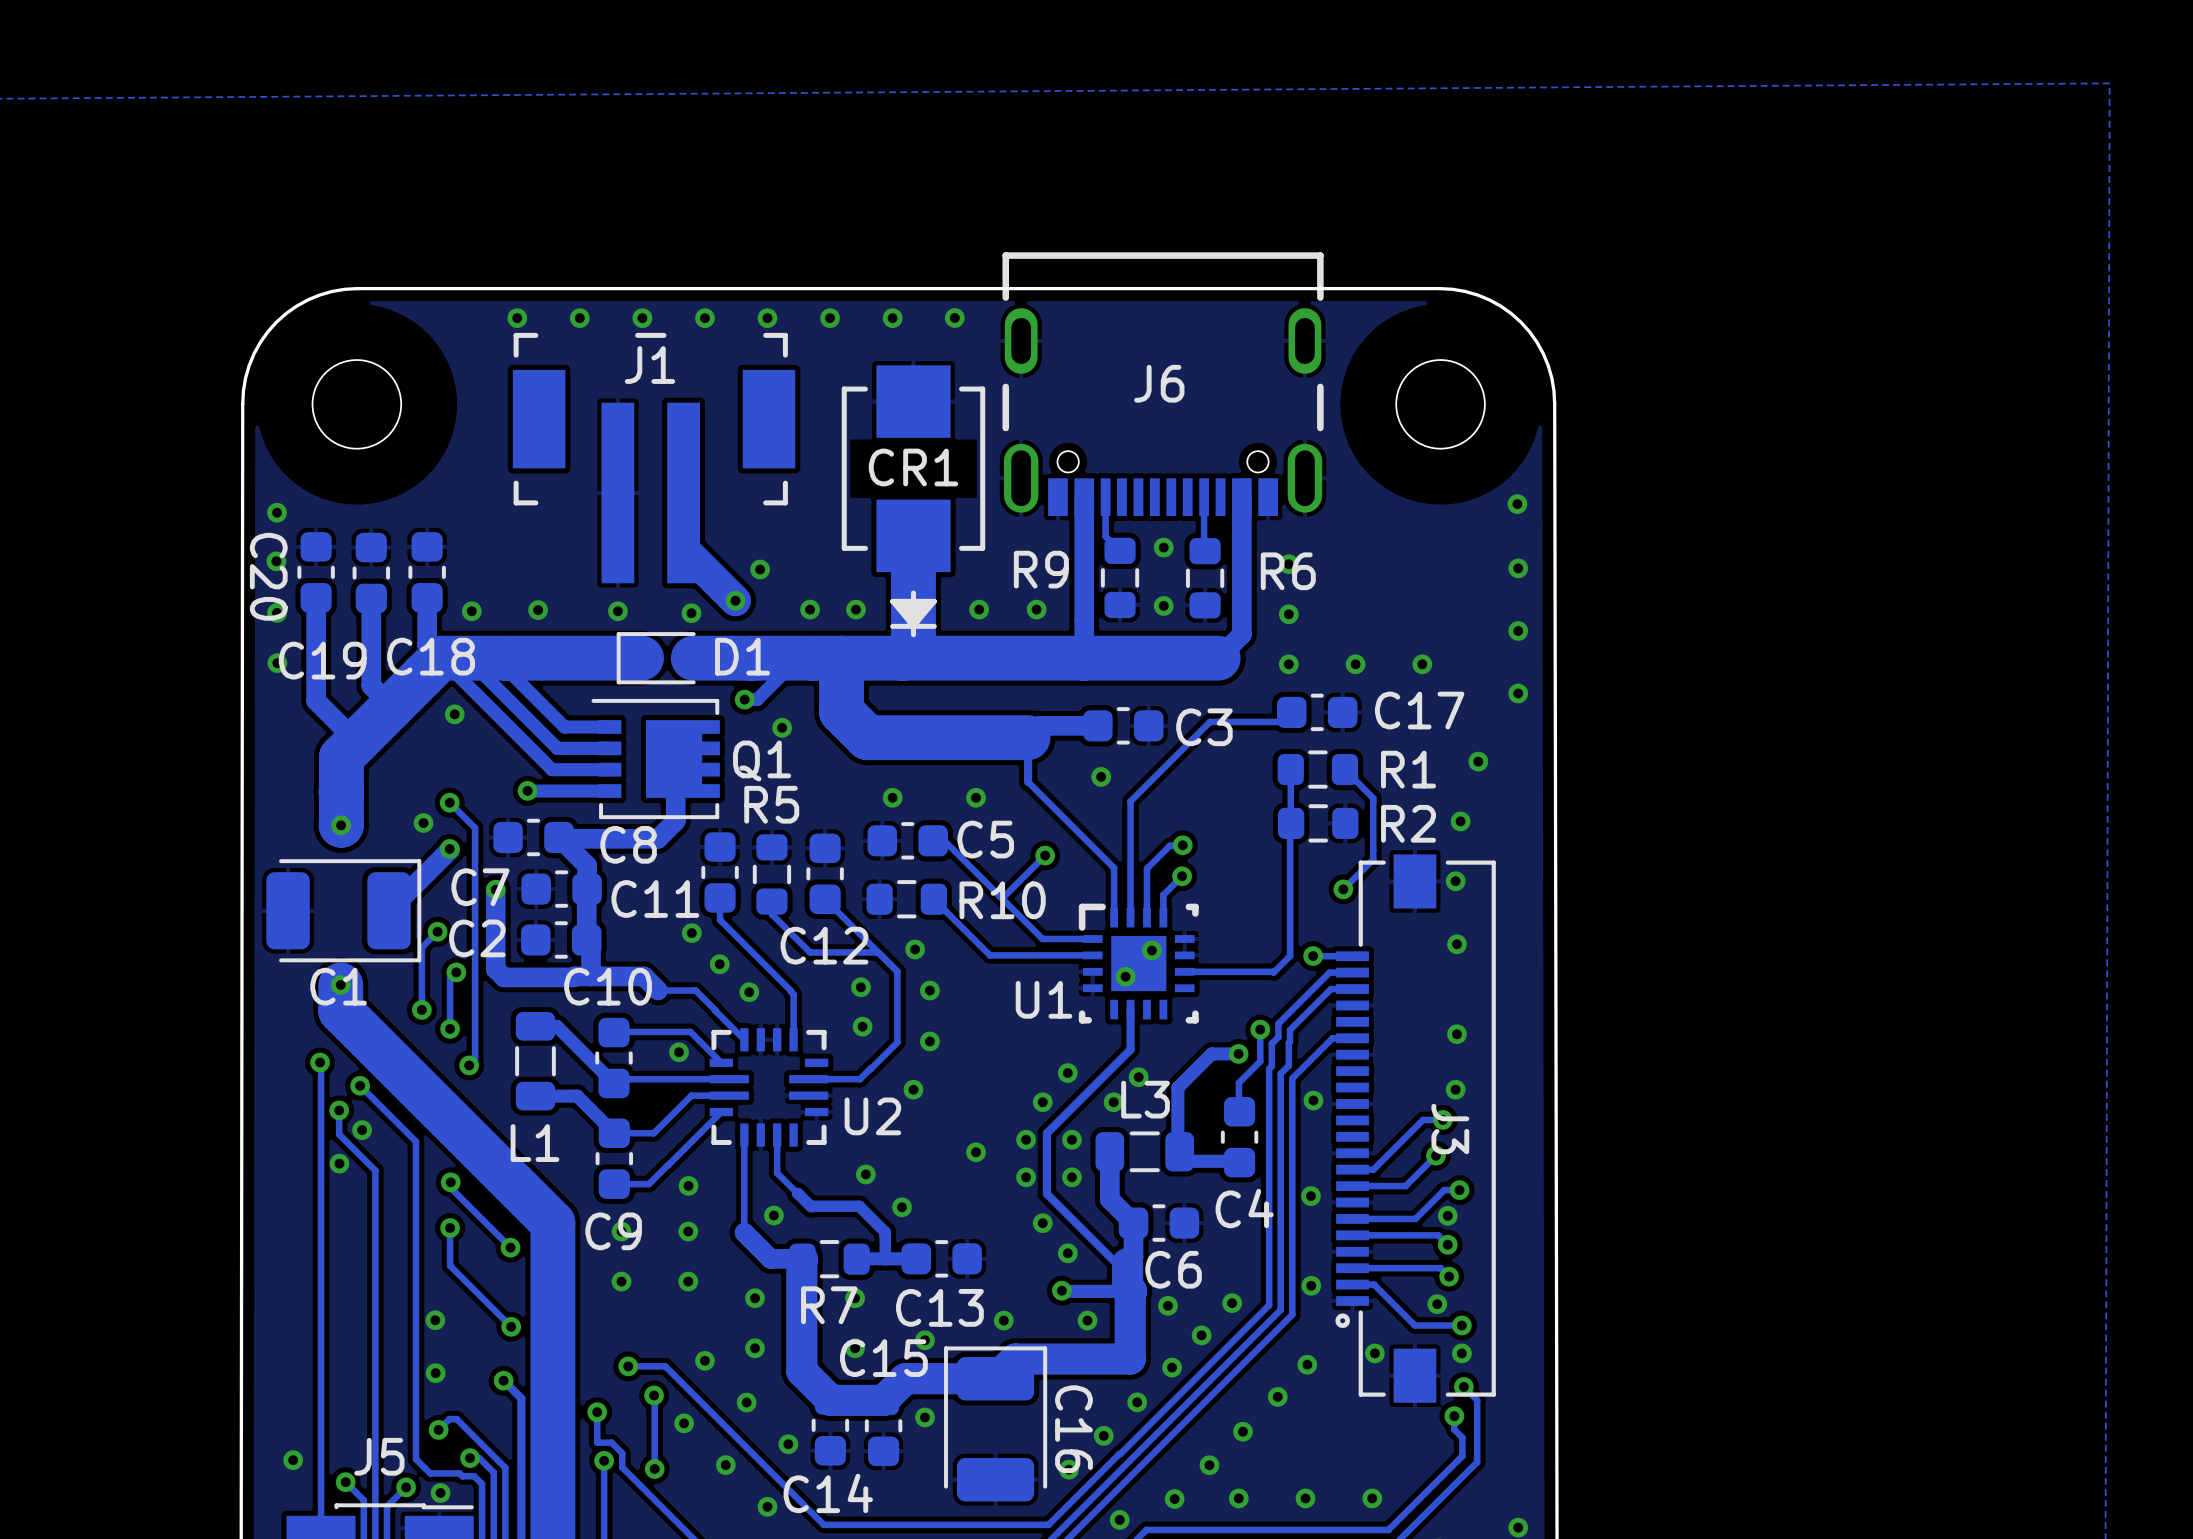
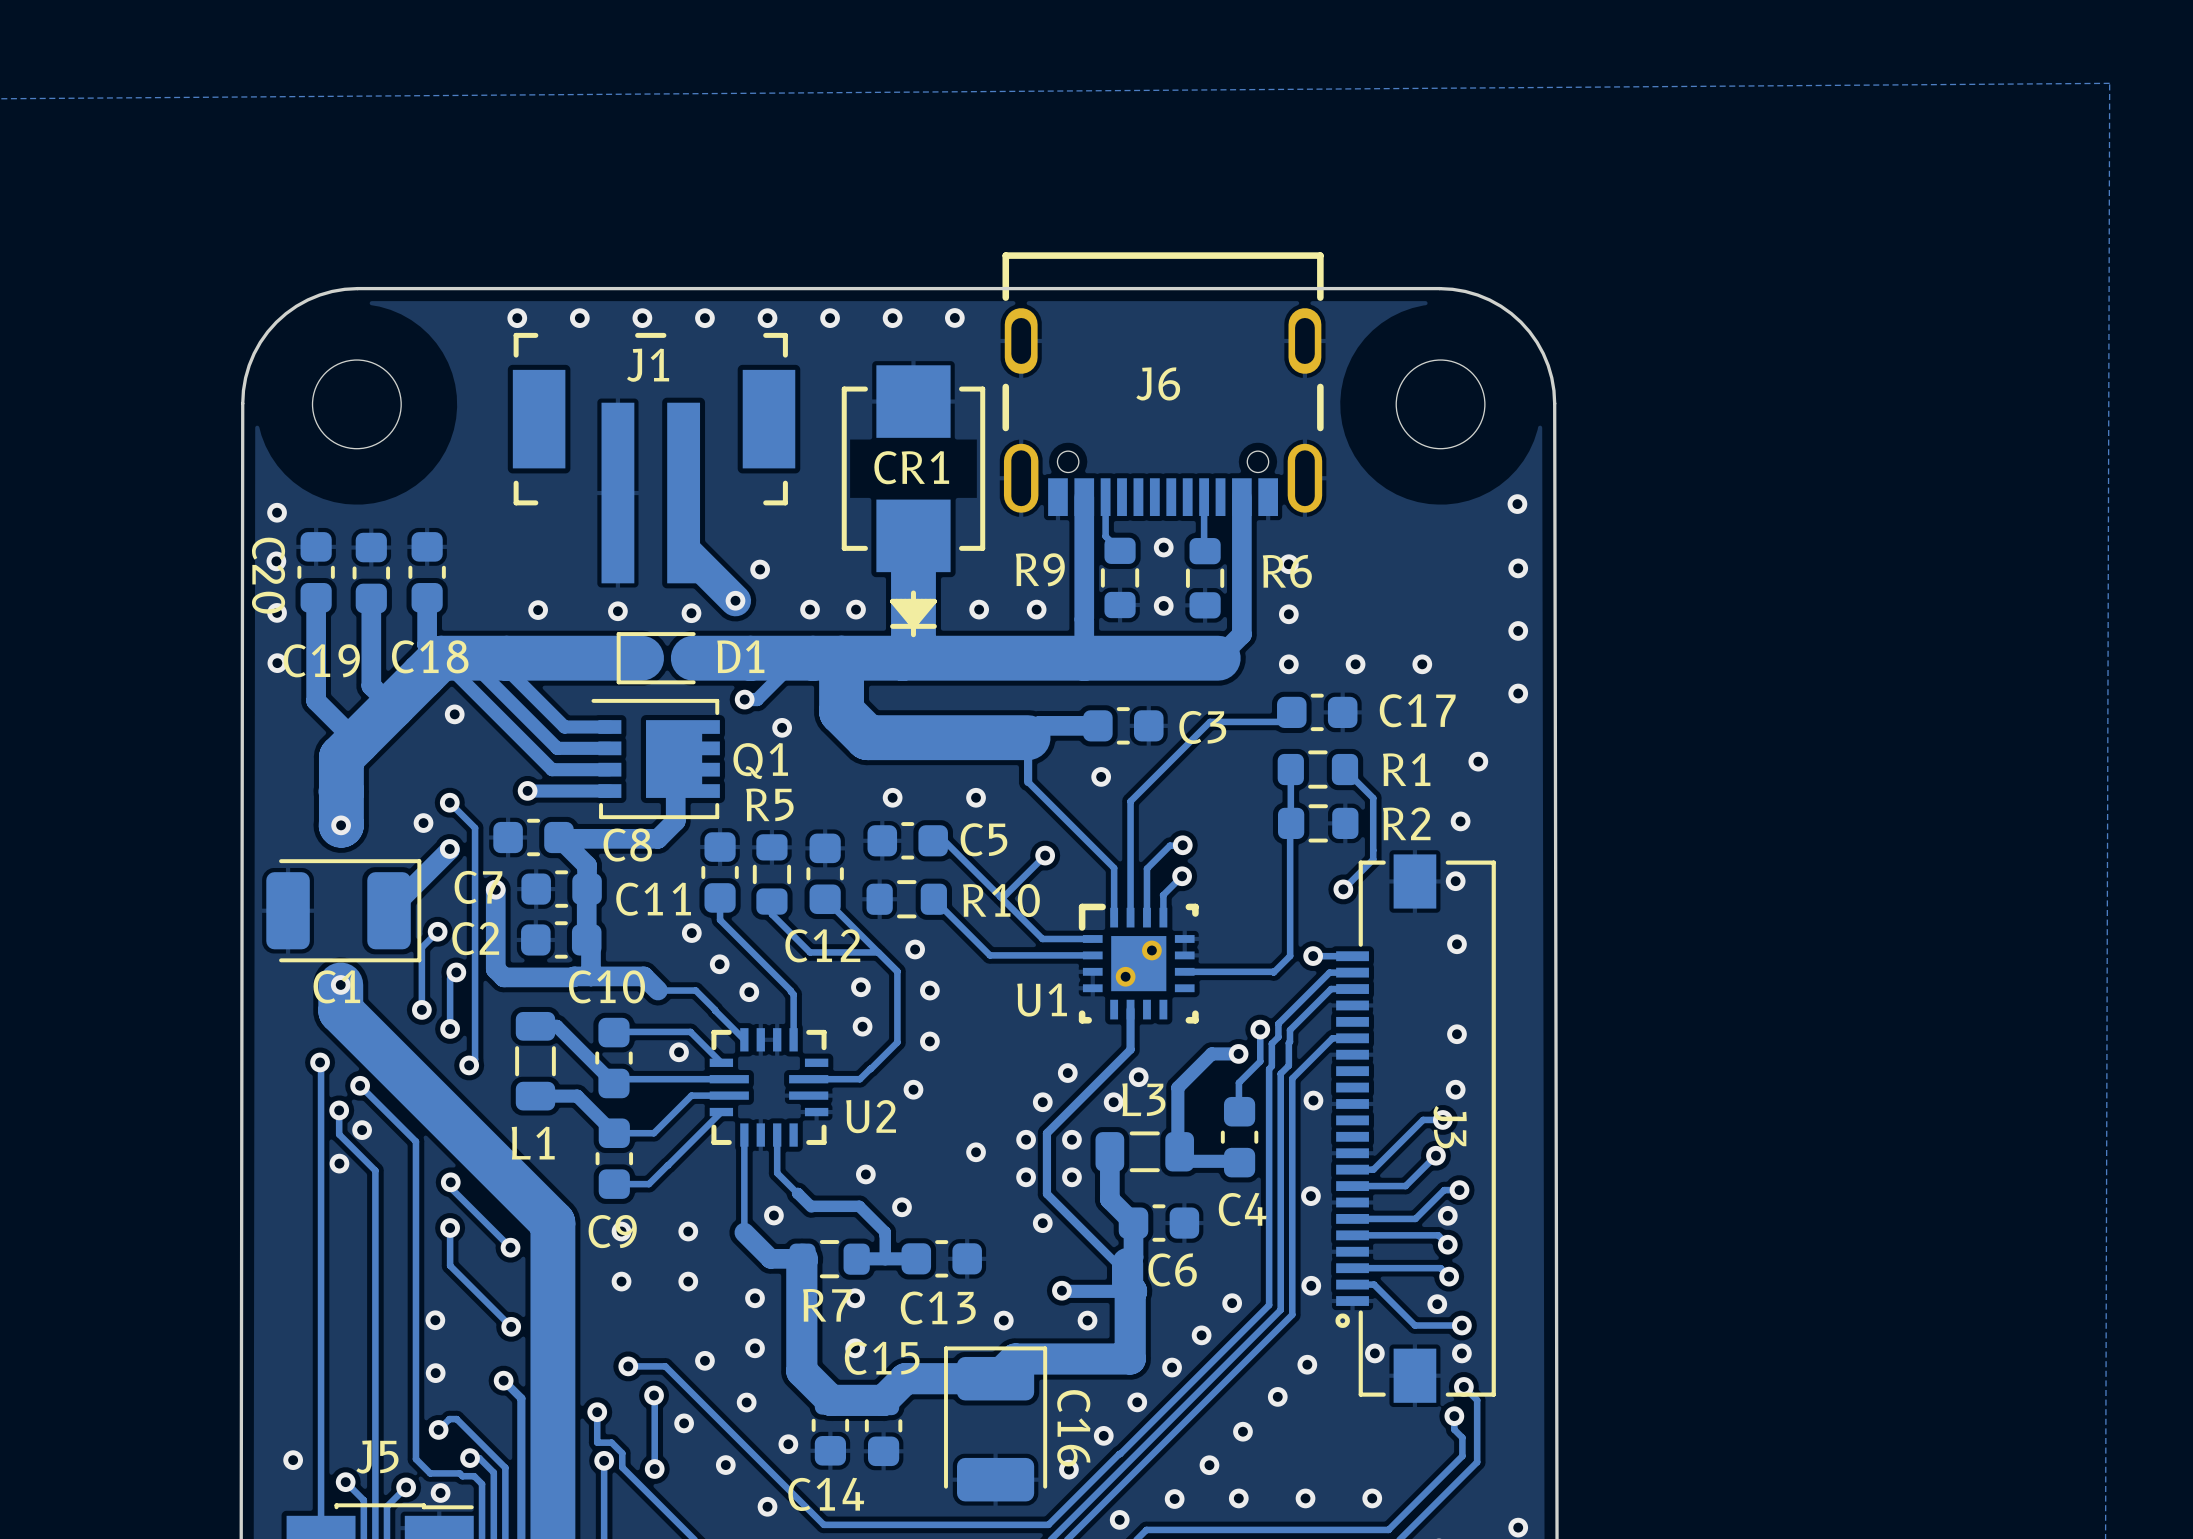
via: (471, 611) -> none
via: (688, 1185) -> none
via: (1067, 1253) -> none
via: (1167, 1305) -> none
via: (924, 1340) -> none
via: (924, 1417) -> none

